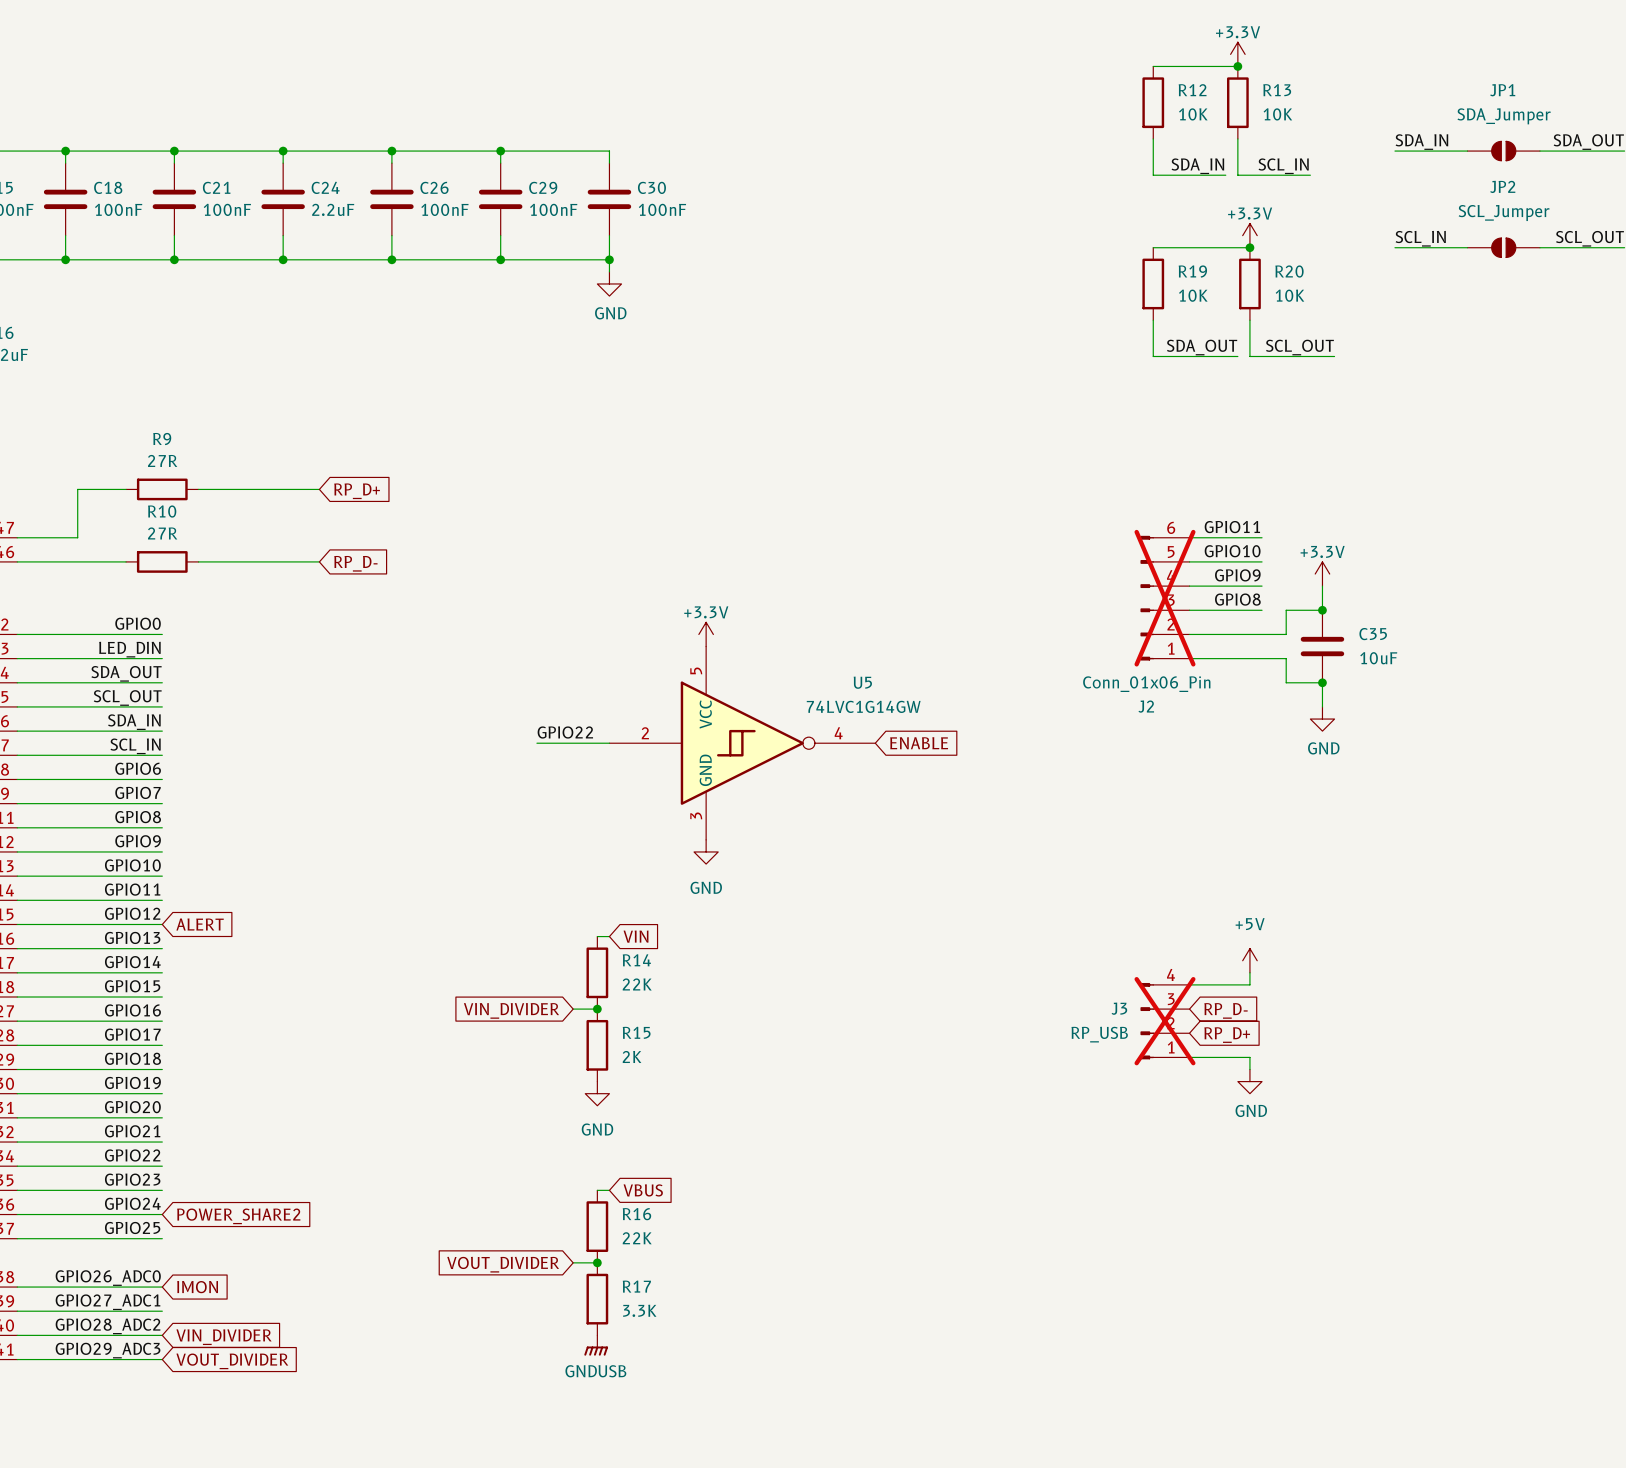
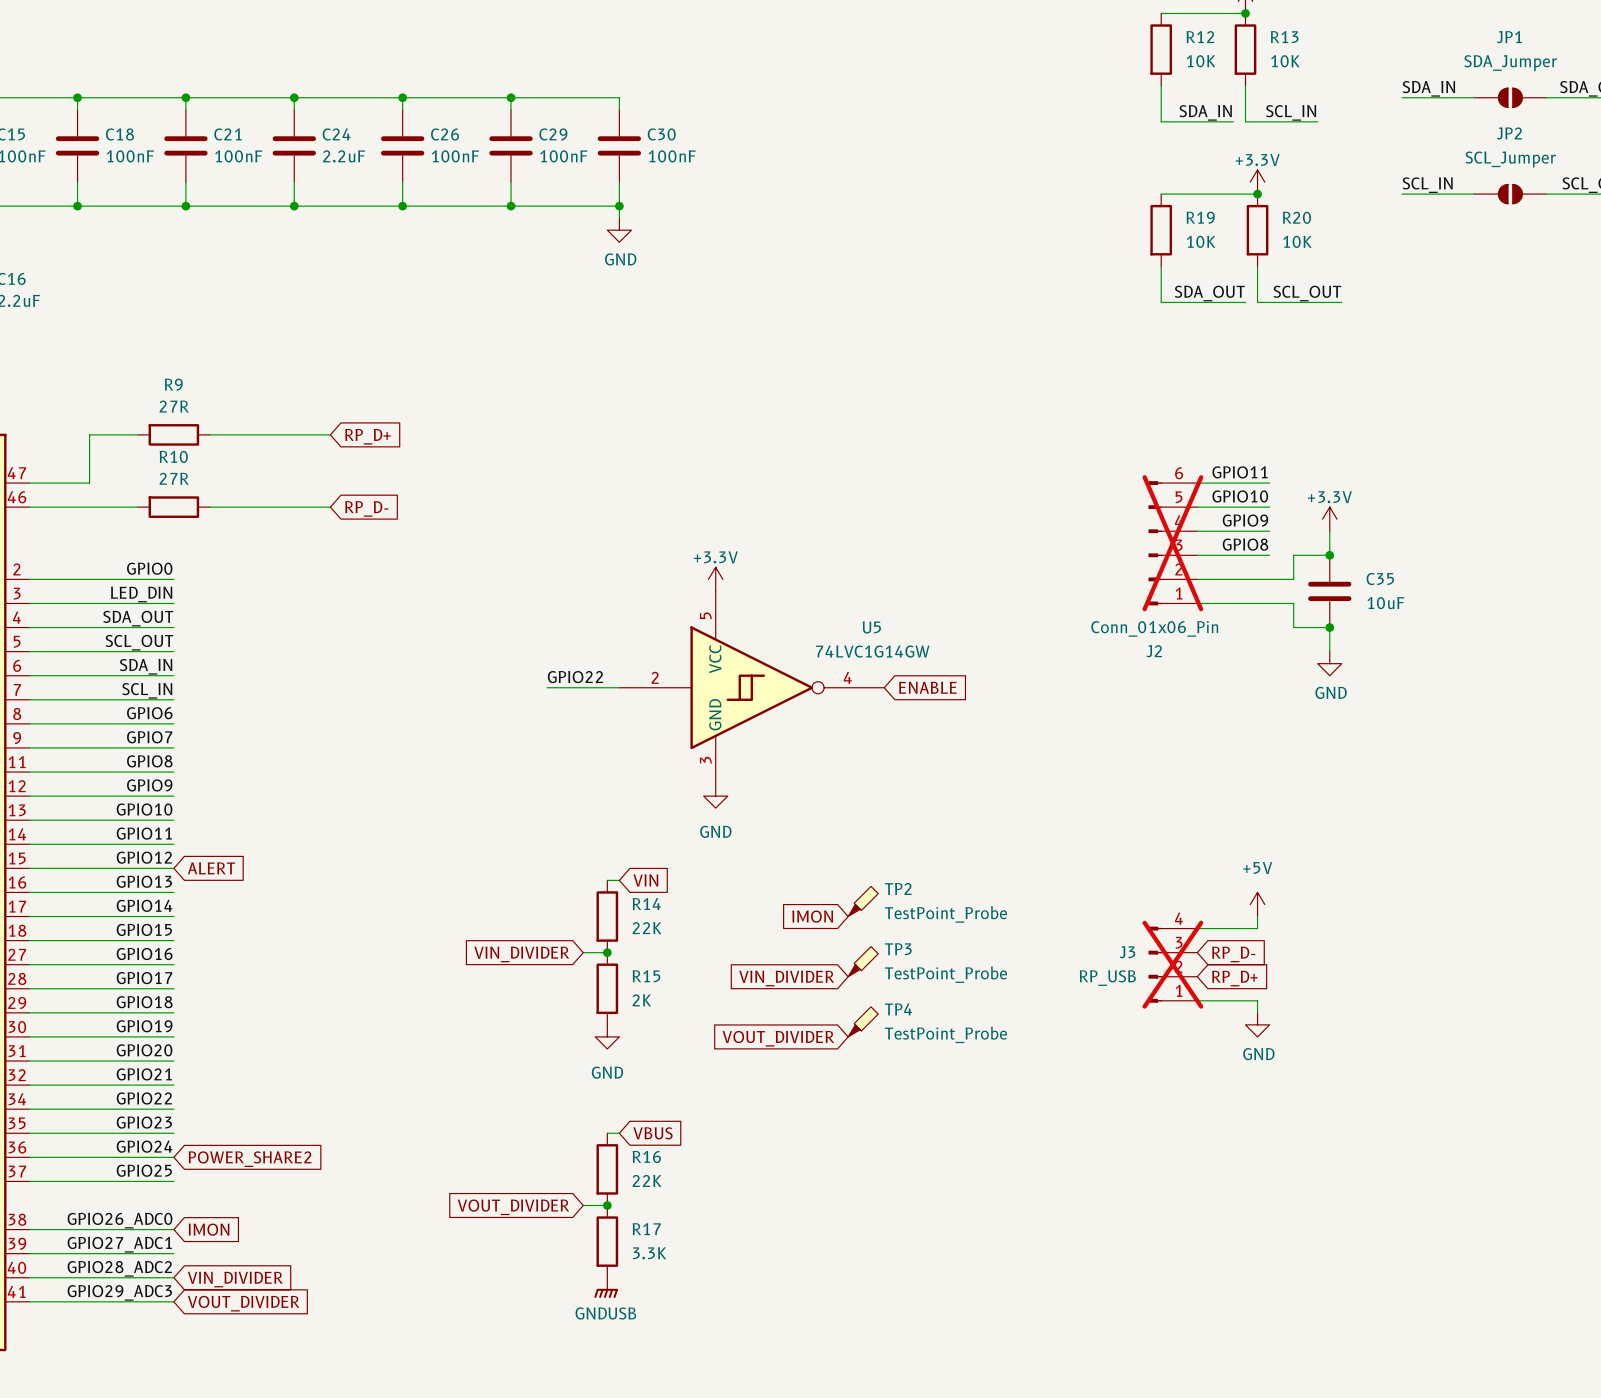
TP2: none -> TestPoint_Probe (863, 901)
global label: none -> IMON (812, 916)
TP3: none -> TestPoint_Probe (863, 961)
global label: none -> VIN_DIVIDER (786, 978)
TP4: none -> TestPoint_Probe (863, 1021)
global label: none -> VOUT_DIVIDER (778, 1038)

